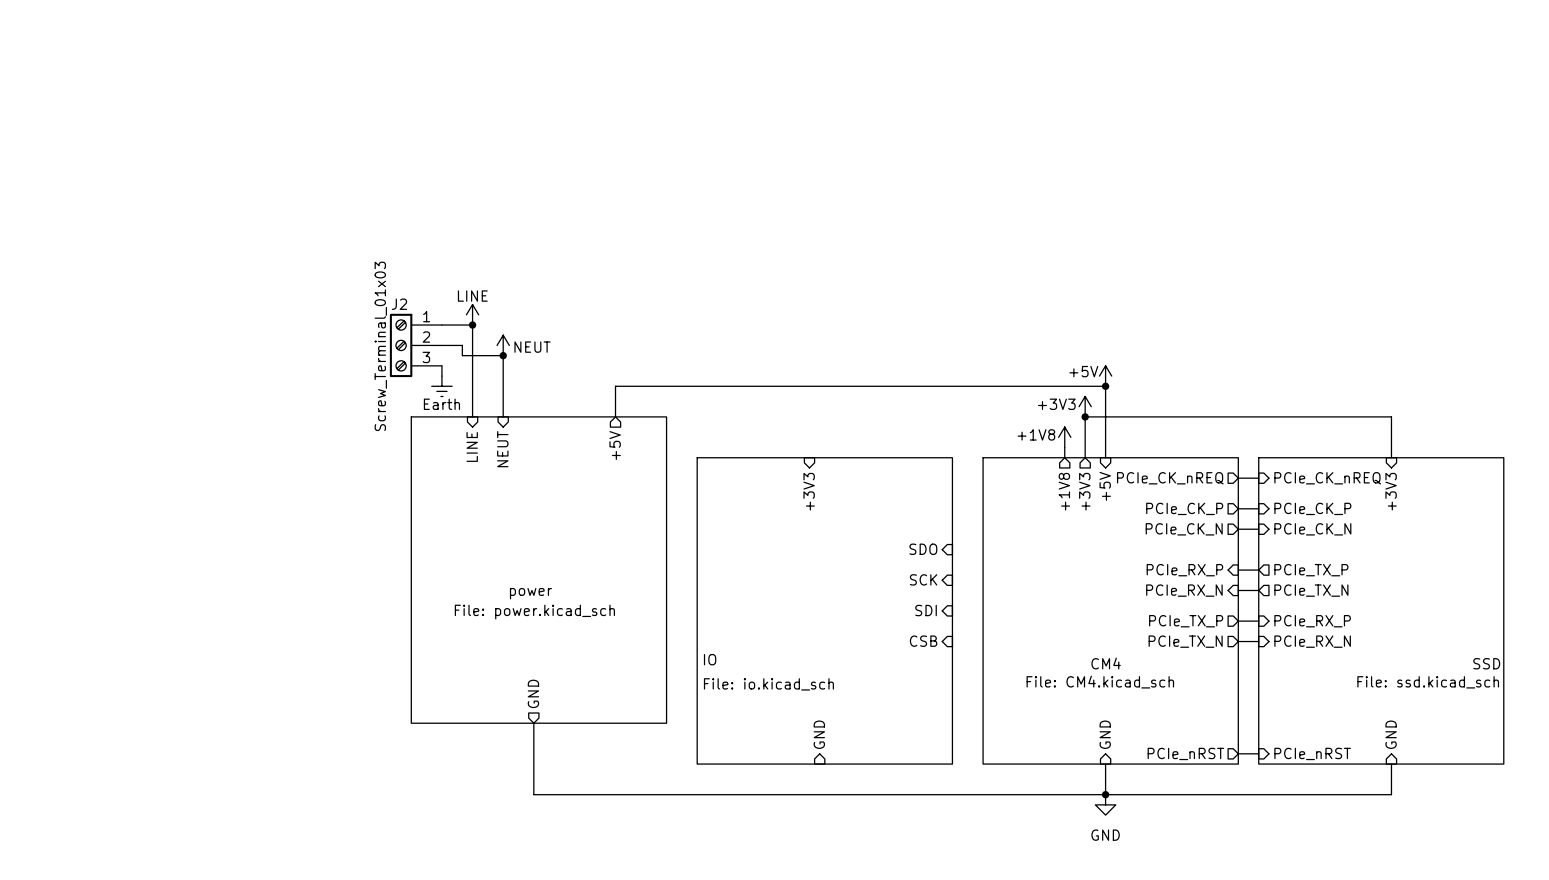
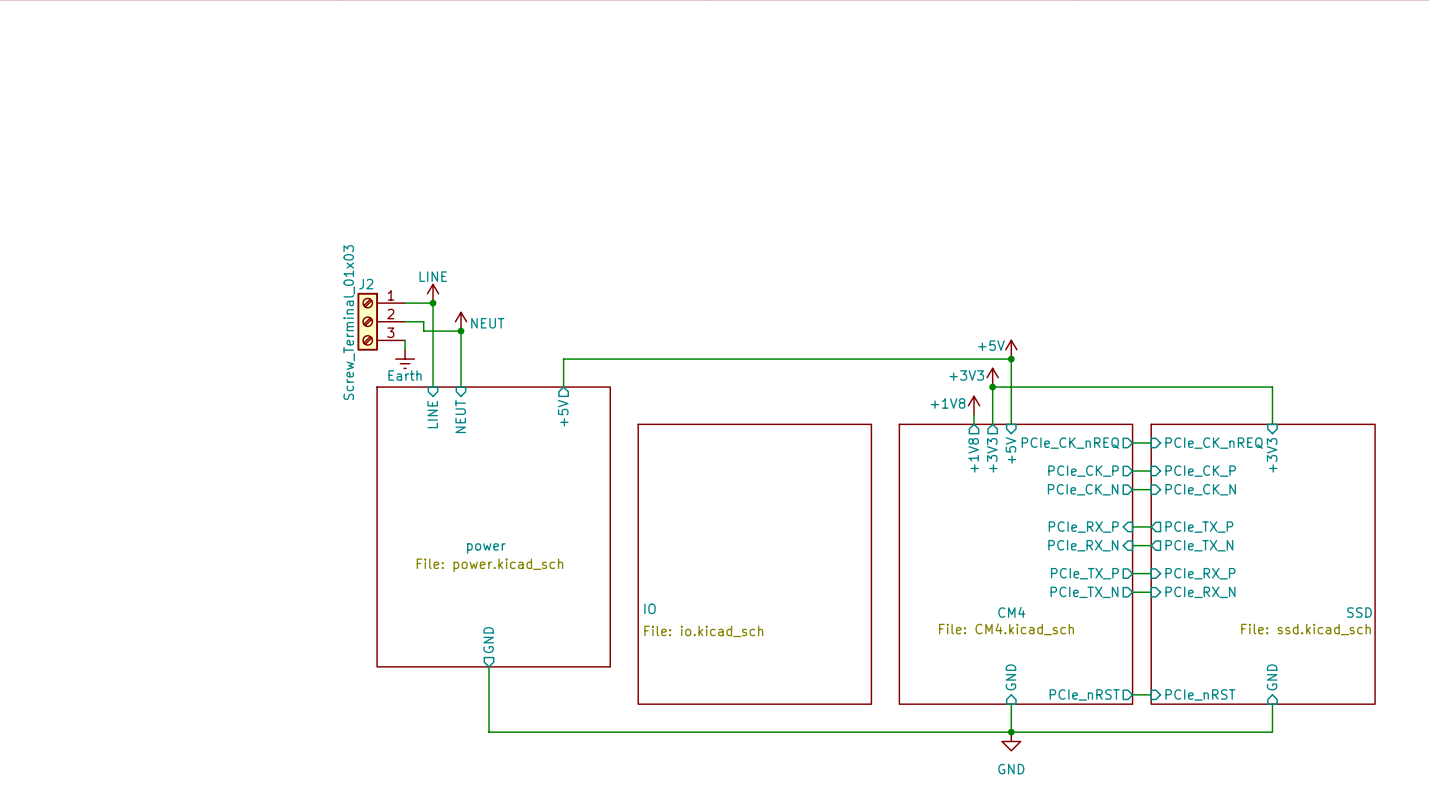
sheet pin: +3V3 (809, 491) -> none
sheet pin: SDO (923, 549) -> none
sheet pin: SCK (923, 579) -> none
sheet pin: SDI (926, 610) -> none
sheet pin: CSB (923, 641) -> none
sheet pin: GND (819, 734) -> none

